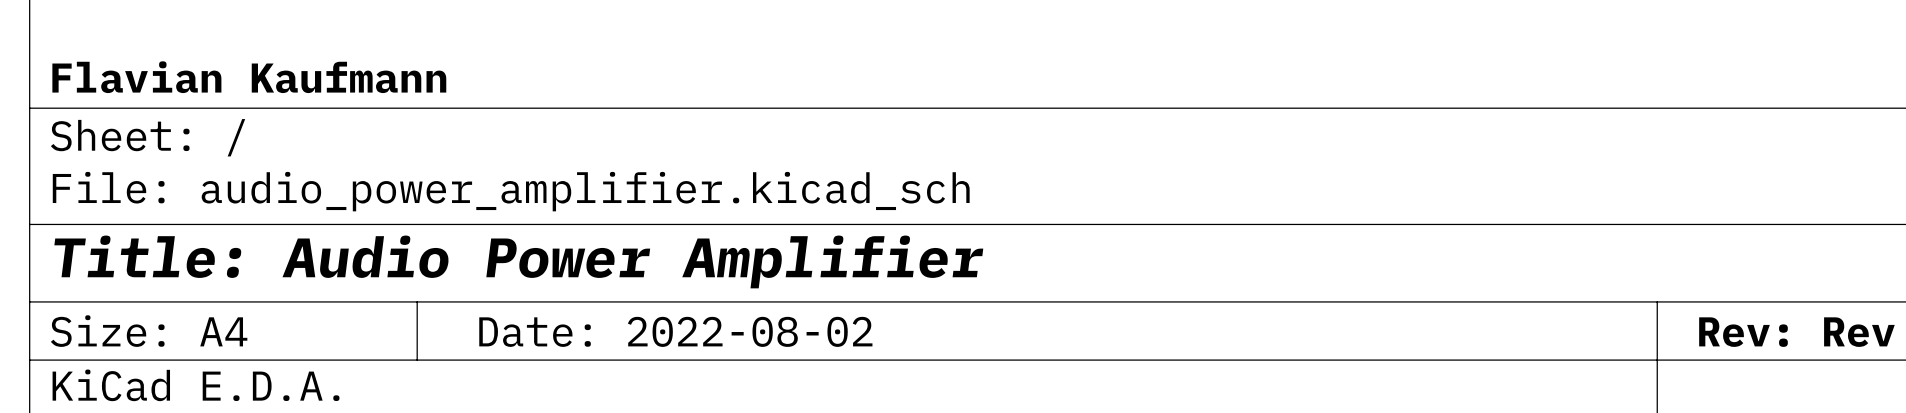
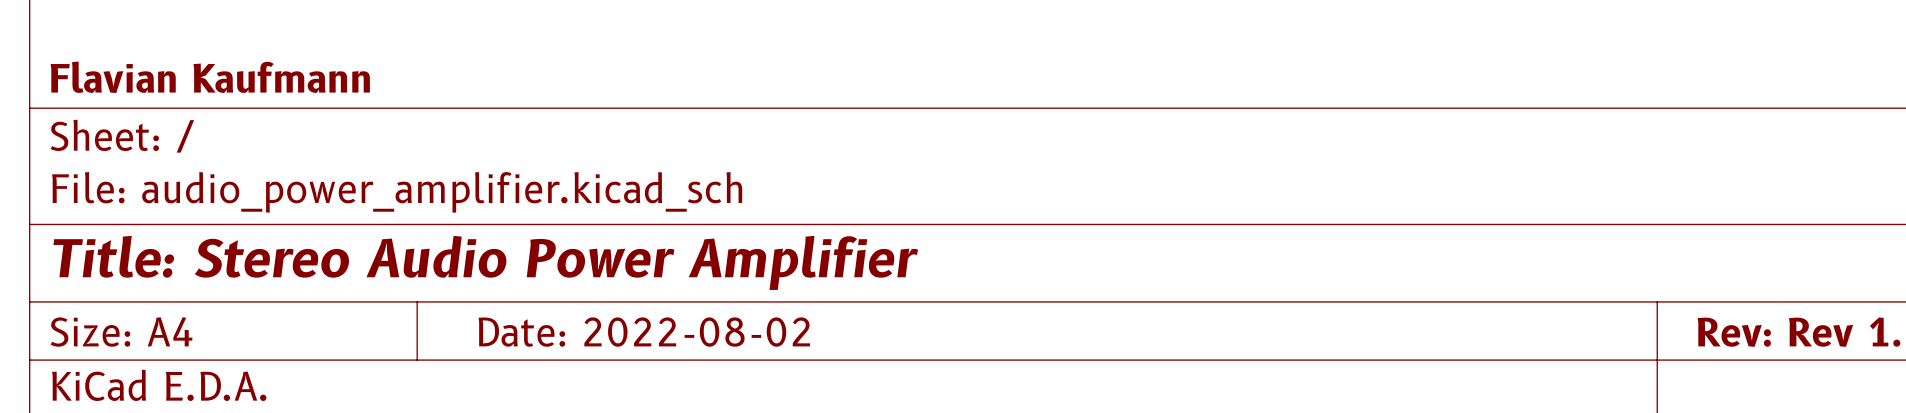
title block: Title: Audio Power Amplifier (518, 261) -> Title: Stereo Audio Power Amplifier (485, 262)

